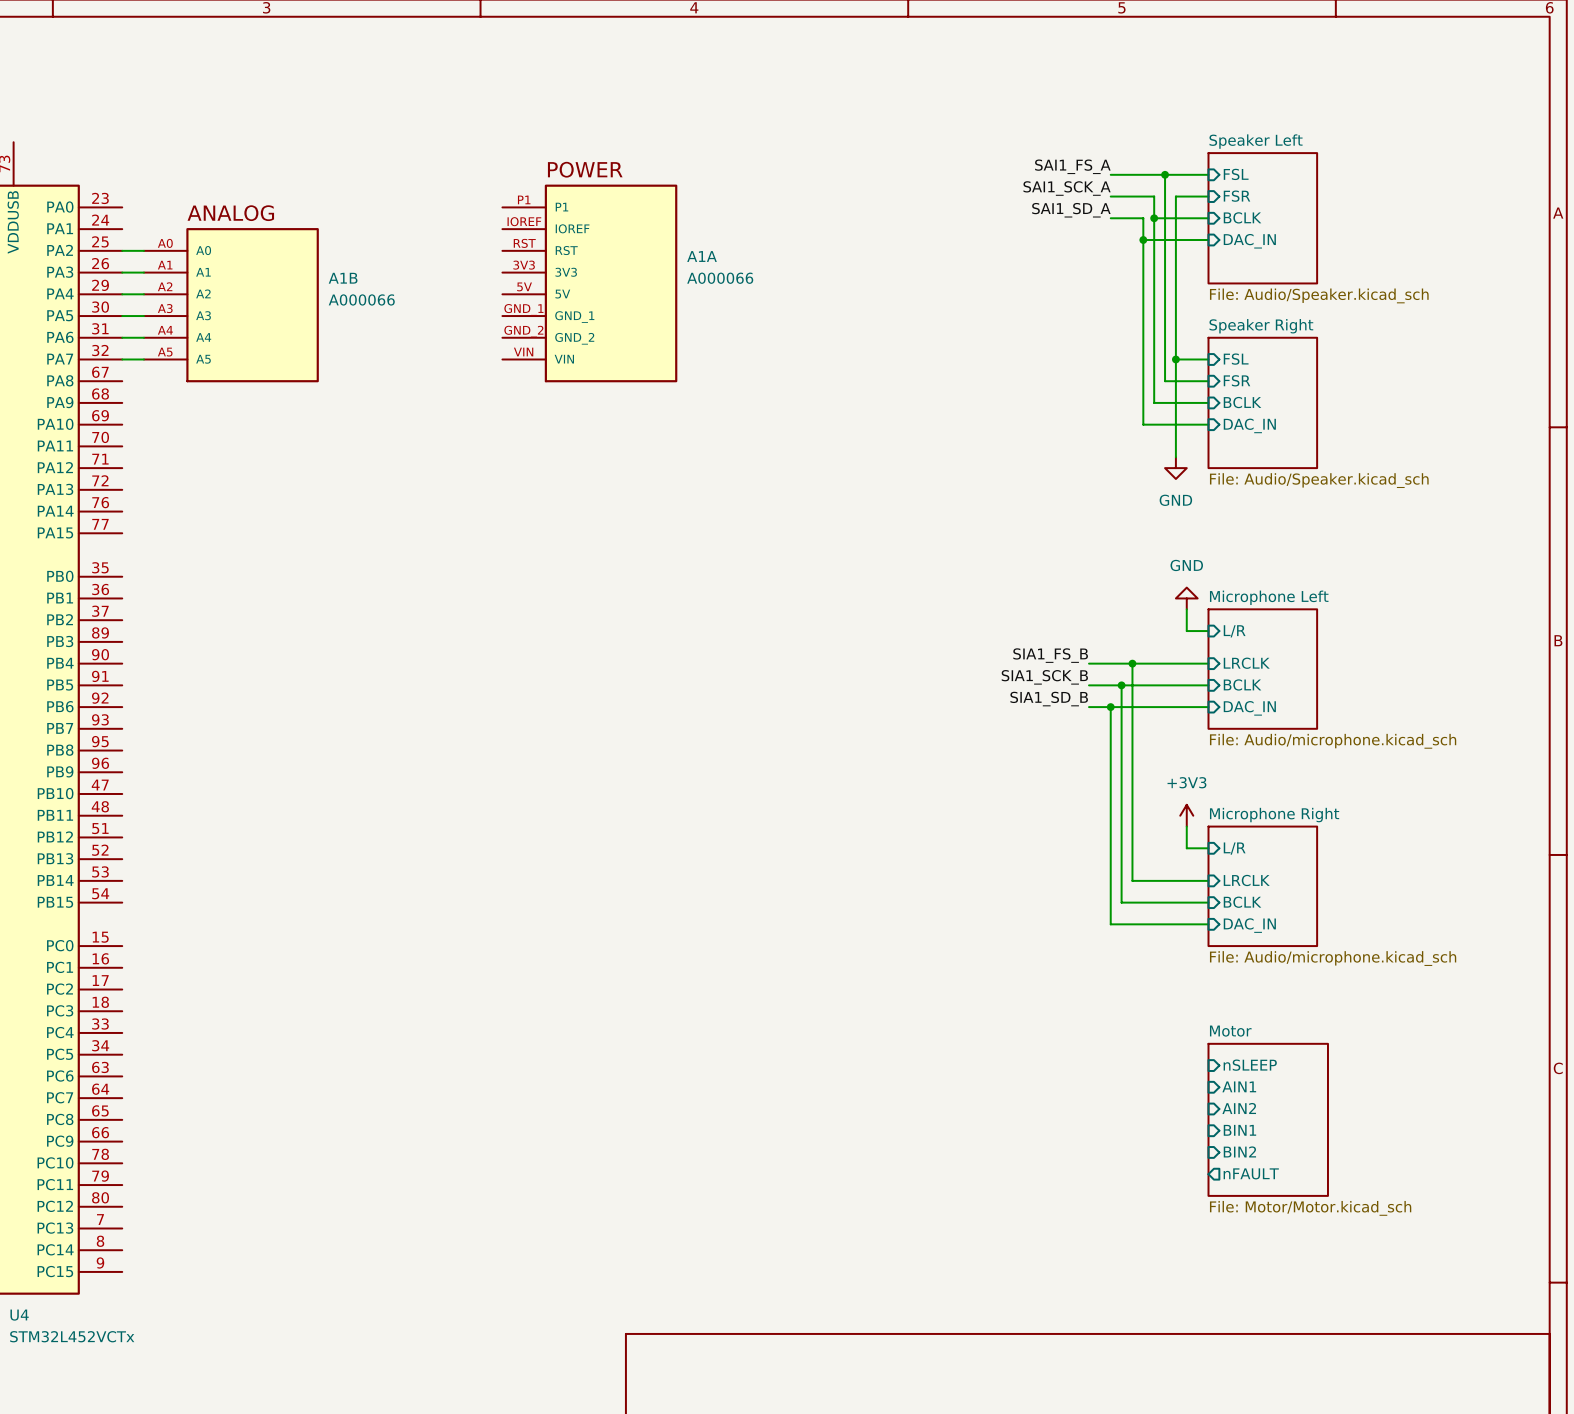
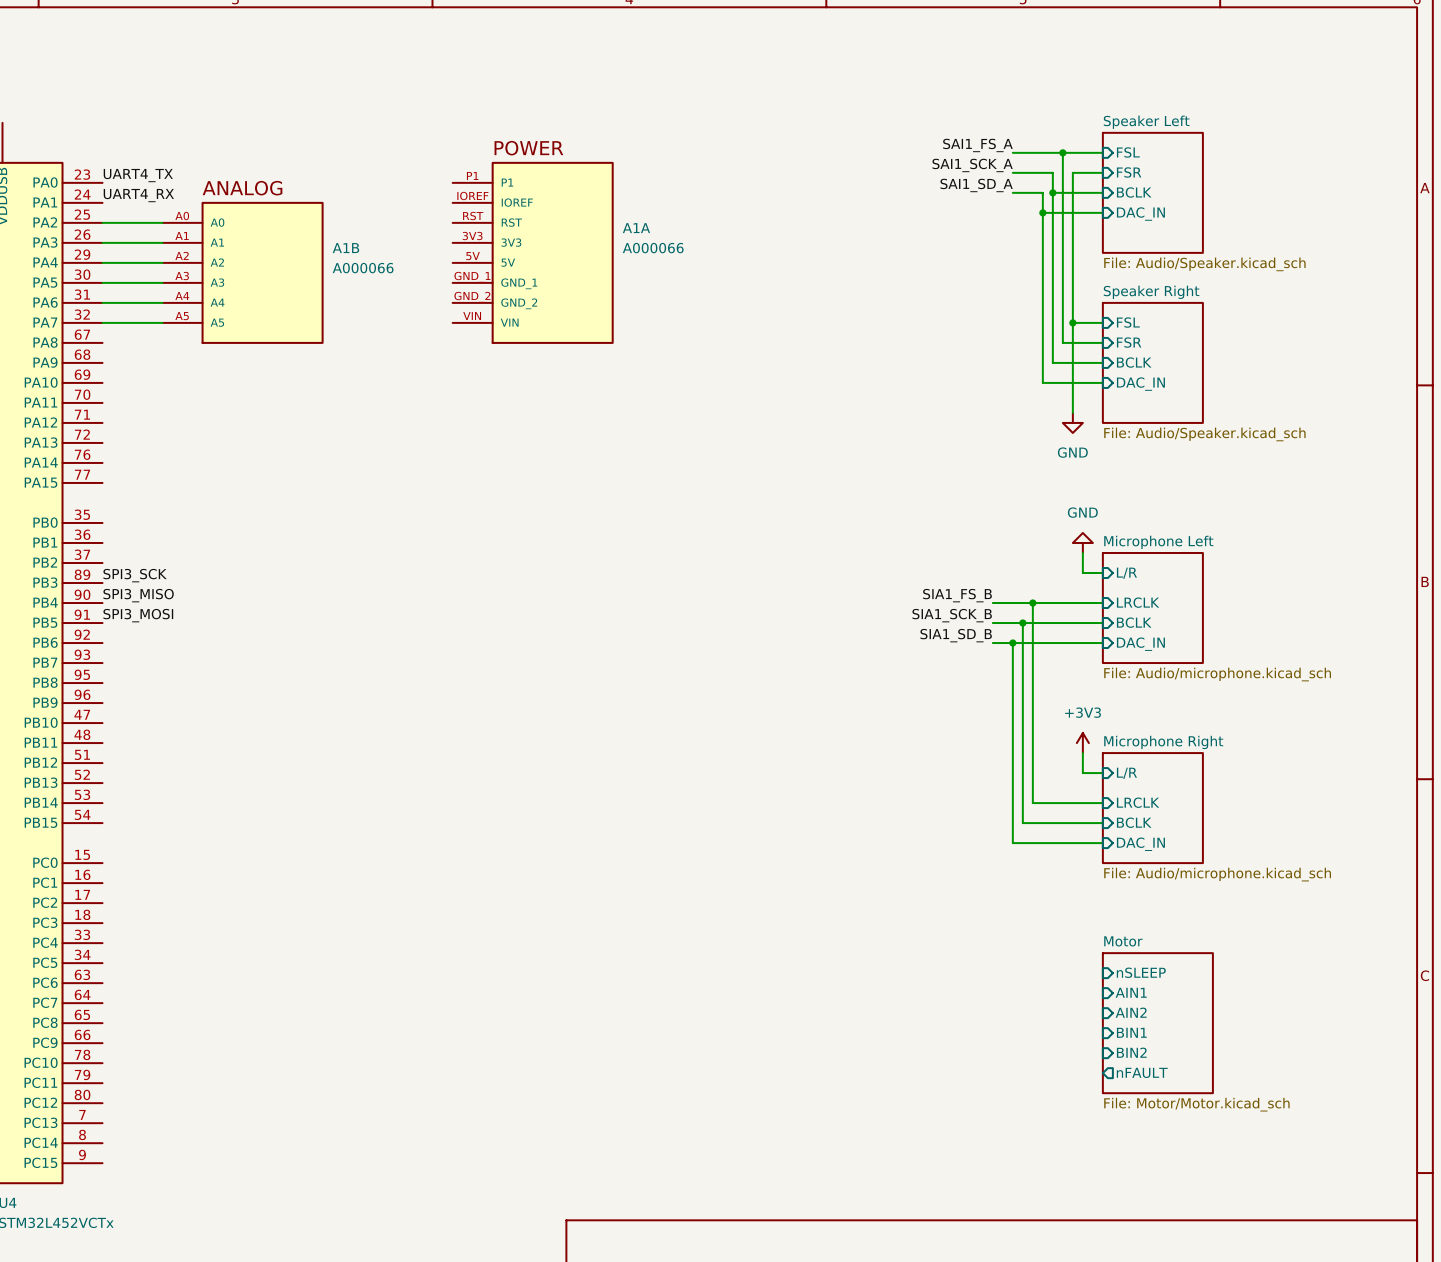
label: none -> UART4_TX (138, 175)
label: none -> UART4_RX (138, 195)
A1B position: (231, 305) -> (243, 272)
label: none -> SPI3_SCK (135, 575)
label: none -> SPI3_MISO (138, 595)
label: none -> SPI3_MOSI (138, 615)

